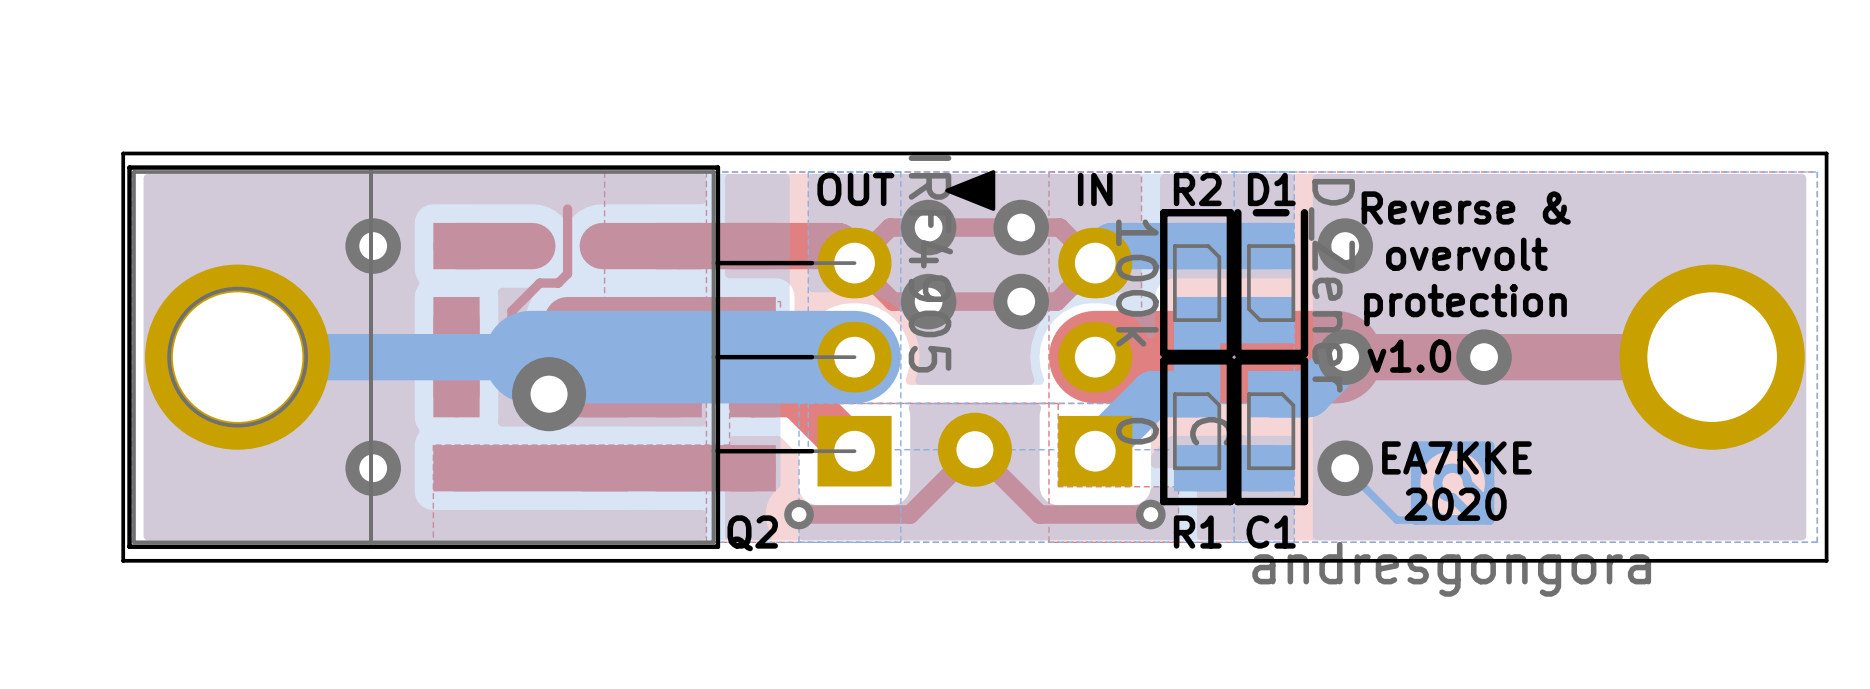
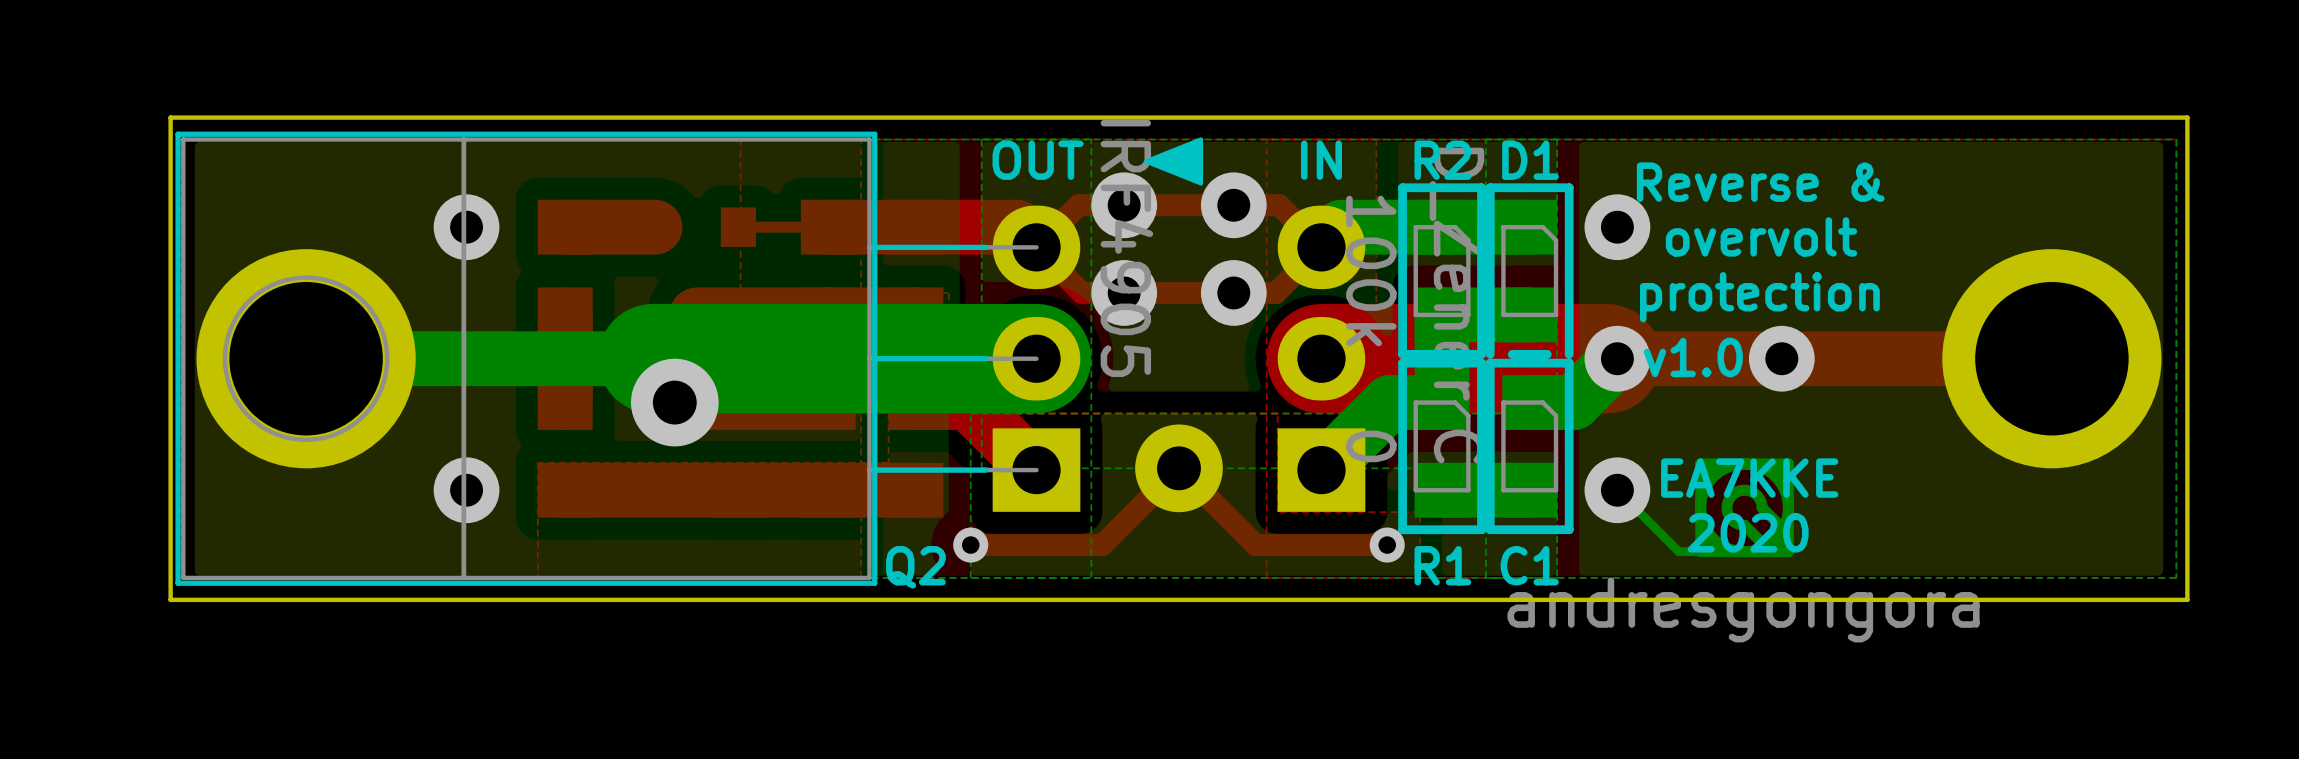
top track: (567, 209) (567, 273) (558, 283) (539, 283) (512, 310) (512, 357) (549, 394) -> none
top track width: thick (678, 246) (602, 246) -> thin (828, 227) (738, 227)
D1 rotation: 0° (1271, 283) -> 180° (1529, 271)

